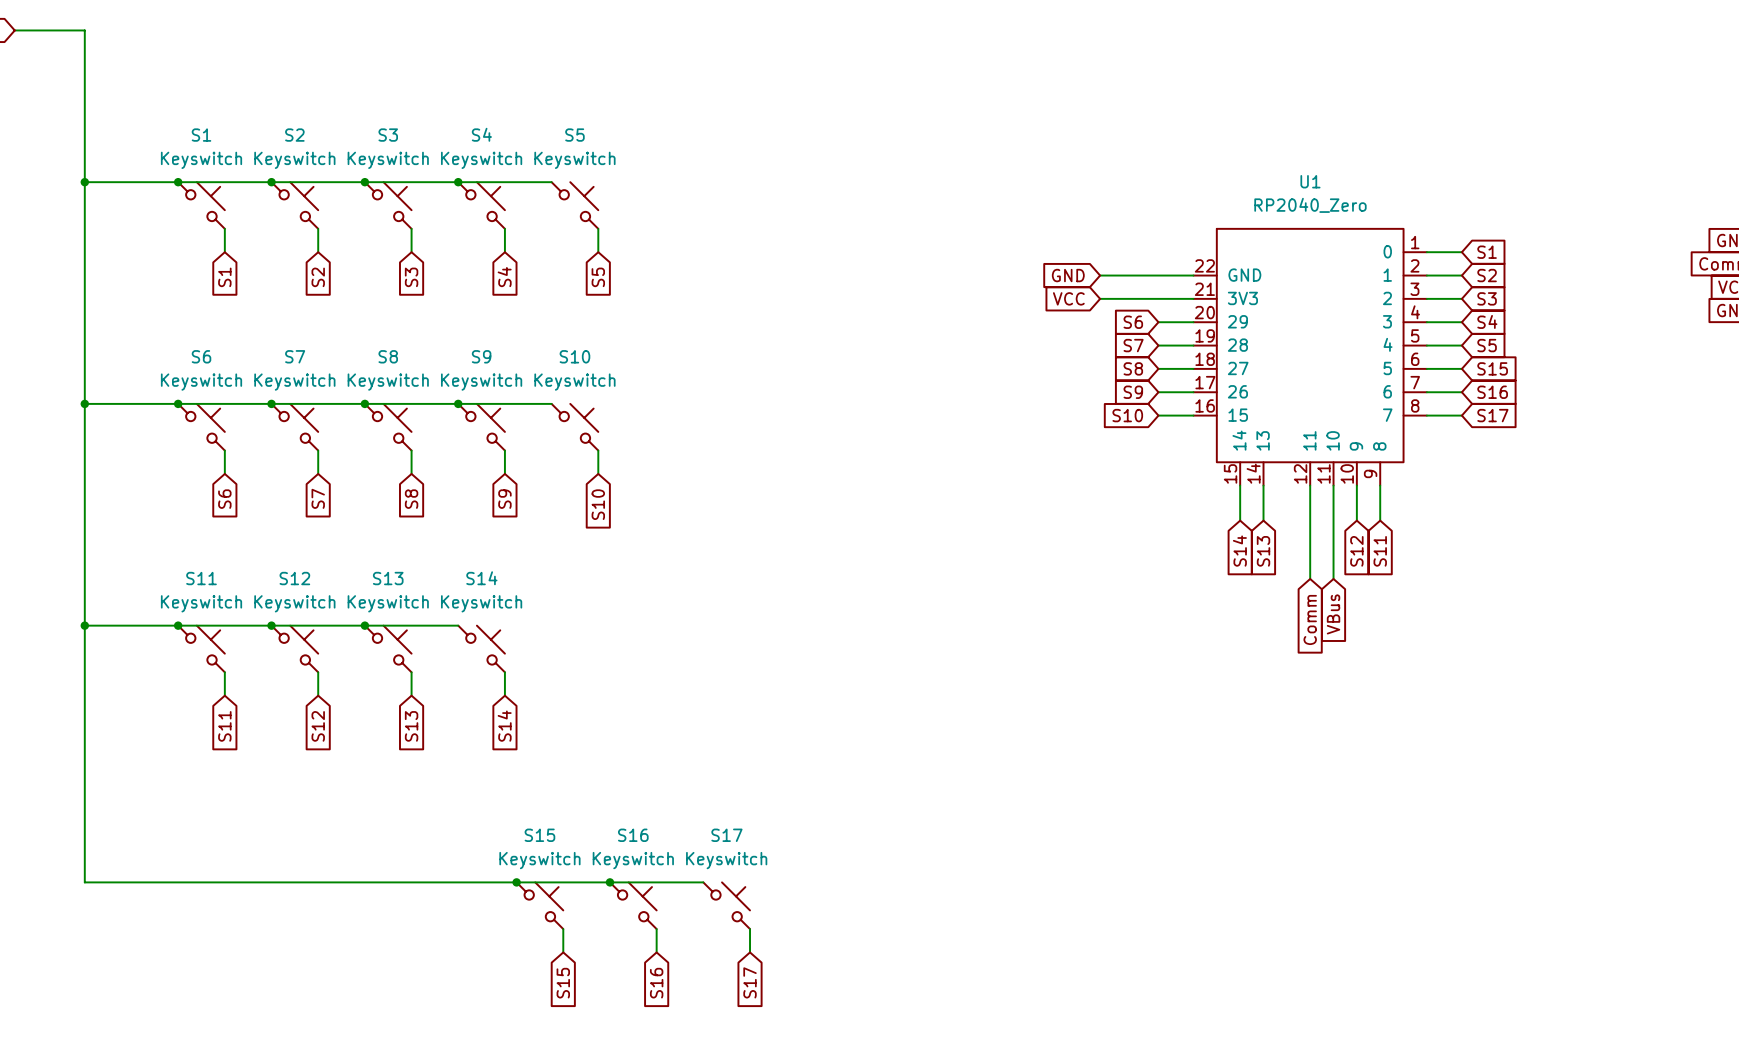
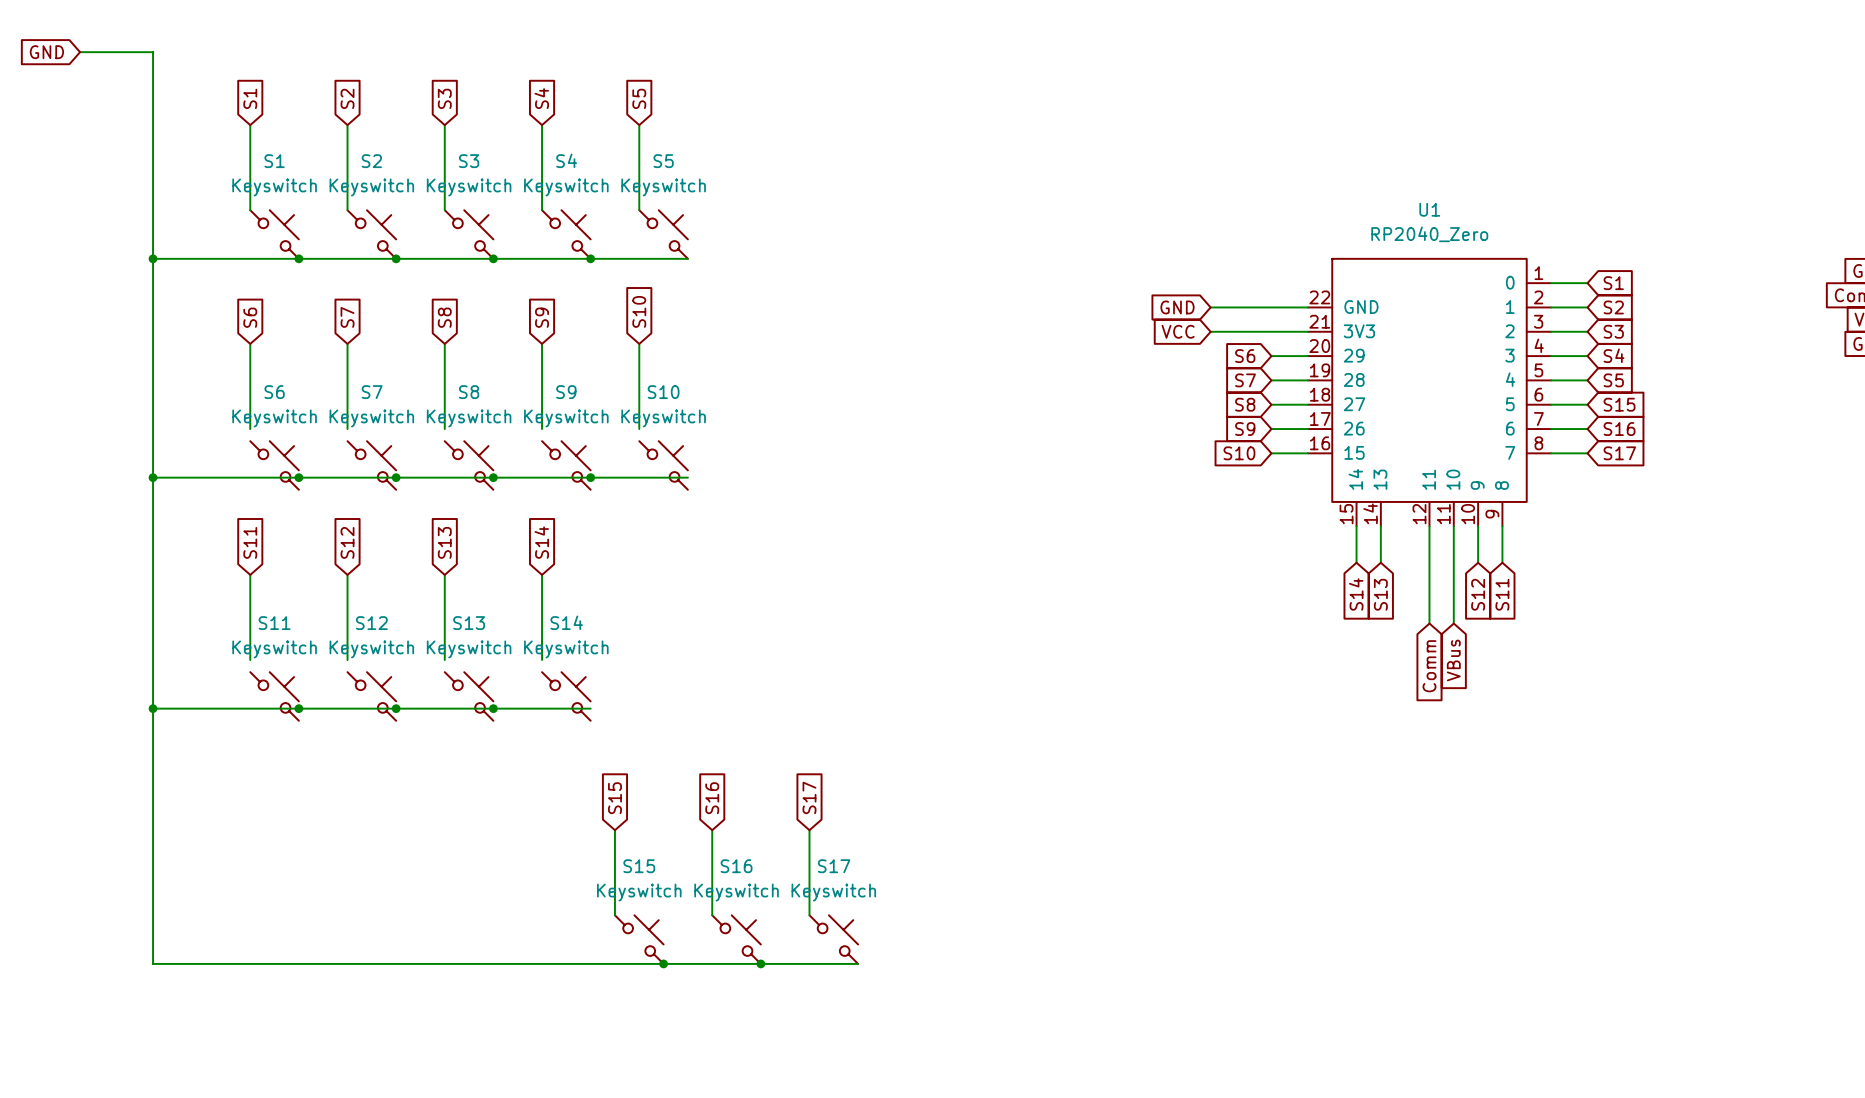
wire: none -> (250, 125) (250, 210)
wire: none -> (347, 125) (347, 210)
wire: none -> (444, 125) (444, 210)
wire: none -> (542, 125) (542, 210)
wire: (84, 182) (551, 182) -> (639, 125) (639, 210)
junction position: (84, 182) -> (153, 258)
junction: (178, 182) -> none
junction: (271, 182) -> none
junction: (364, 182) -> none
junction: (458, 182) -> none
wire: (224, 228) (224, 252) -> none
junction: none -> (298, 258)
wire: (318, 228) (318, 252) -> none
junction: none -> (396, 258)
wire: (411, 228) (411, 252) -> none
junction: none -> (493, 258)
wire: (504, 228) (504, 252) -> none
junction: none -> (590, 258)
wire: (598, 228) (598, 252) -> (687, 258) (153, 258)
global label rotation: 0° (224, 277) -> 180° (250, 98)
global label position: S1 (224, 277) -> S1 (250, 98)
global label rotation: 0° (318, 277) -> 180° (347, 98)
global label position: S2 (318, 277) -> S2 (347, 98)
global label rotation: 0° (411, 277) -> 180° (444, 98)
global label position: S3 (411, 277) -> S3 (444, 98)
global label rotation: 0° (504, 277) -> 180° (541, 98)
global label position: S4 (504, 277) -> S4 (541, 98)
global label rotation: 0° (598, 277) -> 180° (639, 98)
global label position: S5 (598, 277) -> S5 (639, 98)
wire: none -> (250, 343) (250, 429)
wire: none -> (347, 343) (347, 429)
wire: none -> (444, 343) (444, 429)
wire: none -> (542, 343) (542, 429)
wire: none -> (639, 343) (639, 429)
wire: (84, 403) (551, 403) -> none
junction position: (84, 403) -> (153, 477)
junction: (178, 403) -> none
junction: (271, 403) -> none
junction: (364, 403) -> none
junction: (458, 403) -> none
wire: none -> (153, 477) (687, 477)
junction: none -> (298, 477)
junction: none -> (396, 477)
junction: none -> (493, 477)
junction: none -> (590, 477)
wire: (224, 450) (224, 473) -> none
wire: (318, 450) (318, 473) -> none
wire: (411, 450) (411, 473) -> none
wire: (504, 450) (504, 473) -> none
wire: (598, 450) (598, 473) -> none
global label rotation: 0° (318, 498) -> 180° (347, 317)
global label position: S7 (318, 498) -> S7 (347, 317)
global label rotation: 0° (224, 499) -> 180° (250, 317)
global label position: S6 (224, 499) -> S6 (250, 317)
global label rotation: 0° (411, 499) -> 180° (444, 317)
global label position: S8 (411, 499) -> S8 (444, 317)
global label rotation: 0° (504, 499) -> 180° (542, 317)
global label position: S9 (504, 499) -> S9 (542, 317)
global label rotation: 0° (598, 504) -> 180° (639, 311)
global label position: S10 (598, 504) -> S10 (639, 311)
wire: none -> (250, 574) (250, 660)
wire: none -> (347, 574) (347, 660)
wire: none -> (444, 574) (444, 660)
wire: none -> (542, 574) (542, 660)
wire: (84, 625) (458, 625) -> none
junction position: (84, 625) -> (153, 708)
junction: (178, 625) -> none
junction: (271, 625) -> none
junction: (364, 625) -> none
wire: none -> (153, 708) (590, 708)
junction: none -> (298, 708)
junction: none -> (396, 708)
junction: none -> (493, 708)
wire: (224, 672) (224, 695) -> none
wire: (318, 672) (318, 695) -> none
wire: (411, 672) (411, 695) -> none
wire: (504, 672) (504, 695) -> none
global label rotation: 0° (224, 726) -> 180° (250, 542)
global label position: S11 (224, 726) -> S11 (250, 542)
global label rotation: 0° (318, 726) -> 180° (347, 542)
global label position: S12 (318, 726) -> S12 (347, 542)
global label rotation: 0° (411, 726) -> 180° (444, 542)
global label position: S13 (411, 726) -> S13 (444, 542)
global label rotation: 0° (504, 726) -> 180° (541, 542)
global label position: S14 (504, 726) -> S14 (541, 542)
wire: none -> (614, 830) (614, 915)
wire: none -> (712, 830) (712, 915)
wire: none -> (809, 830) (809, 915)
wire: (84, 882) (703, 882) -> (153, 939) (153, 963) (858, 963)
junction: (516, 882) -> none
junction: (609, 882) -> none
S15 position: (539, 905) -> (639, 939)
junction: none -> (663, 963)
S16 position: (633, 905) -> (736, 939)
junction: none -> (760, 963)
S17 position: (726, 905) -> (833, 939)
wire: (563, 929) (563, 952) -> none
wire: (656, 929) (656, 952) -> none
wire: (750, 929) (750, 952) -> none
global label rotation: 0° (750, 982) -> 180° (809, 797)
global label position: S17 (750, 982) -> S17 (809, 797)
global label rotation: 0° (563, 983) -> 180° (614, 798)
global label position: S15 (563, 983) -> S15 (614, 798)
global label rotation: 0° (656, 983) -> 180° (712, 798)
global label position: S16 (656, 983) -> S16 (712, 798)

